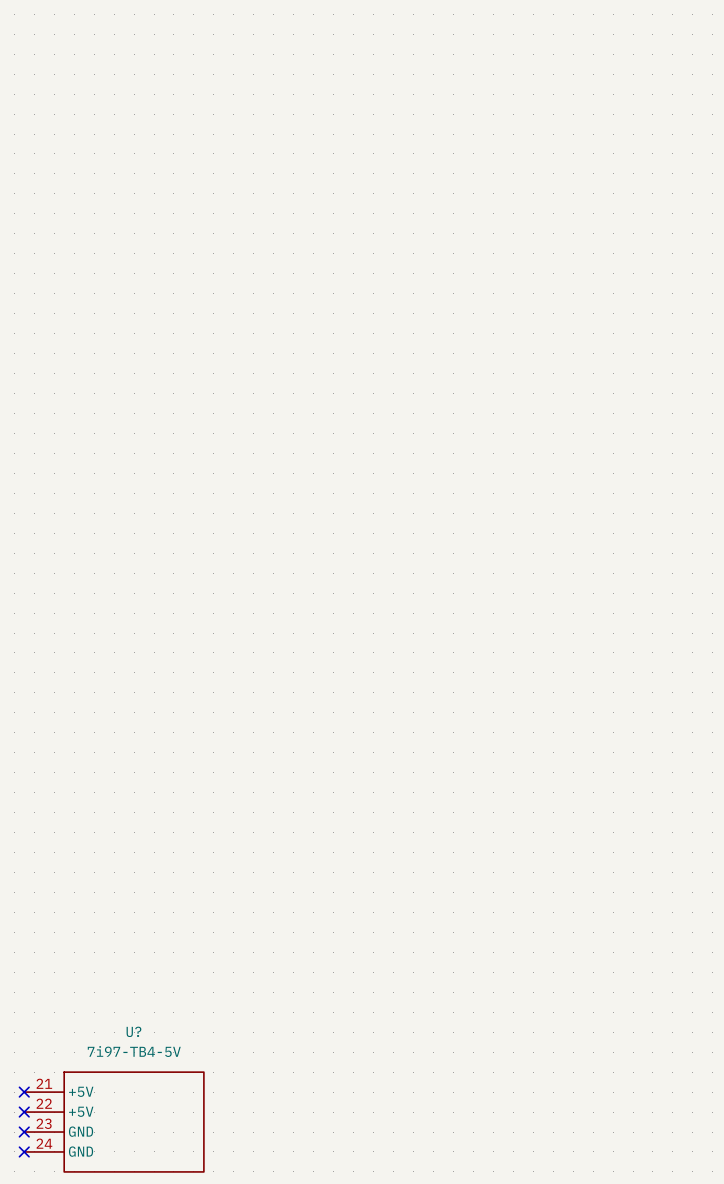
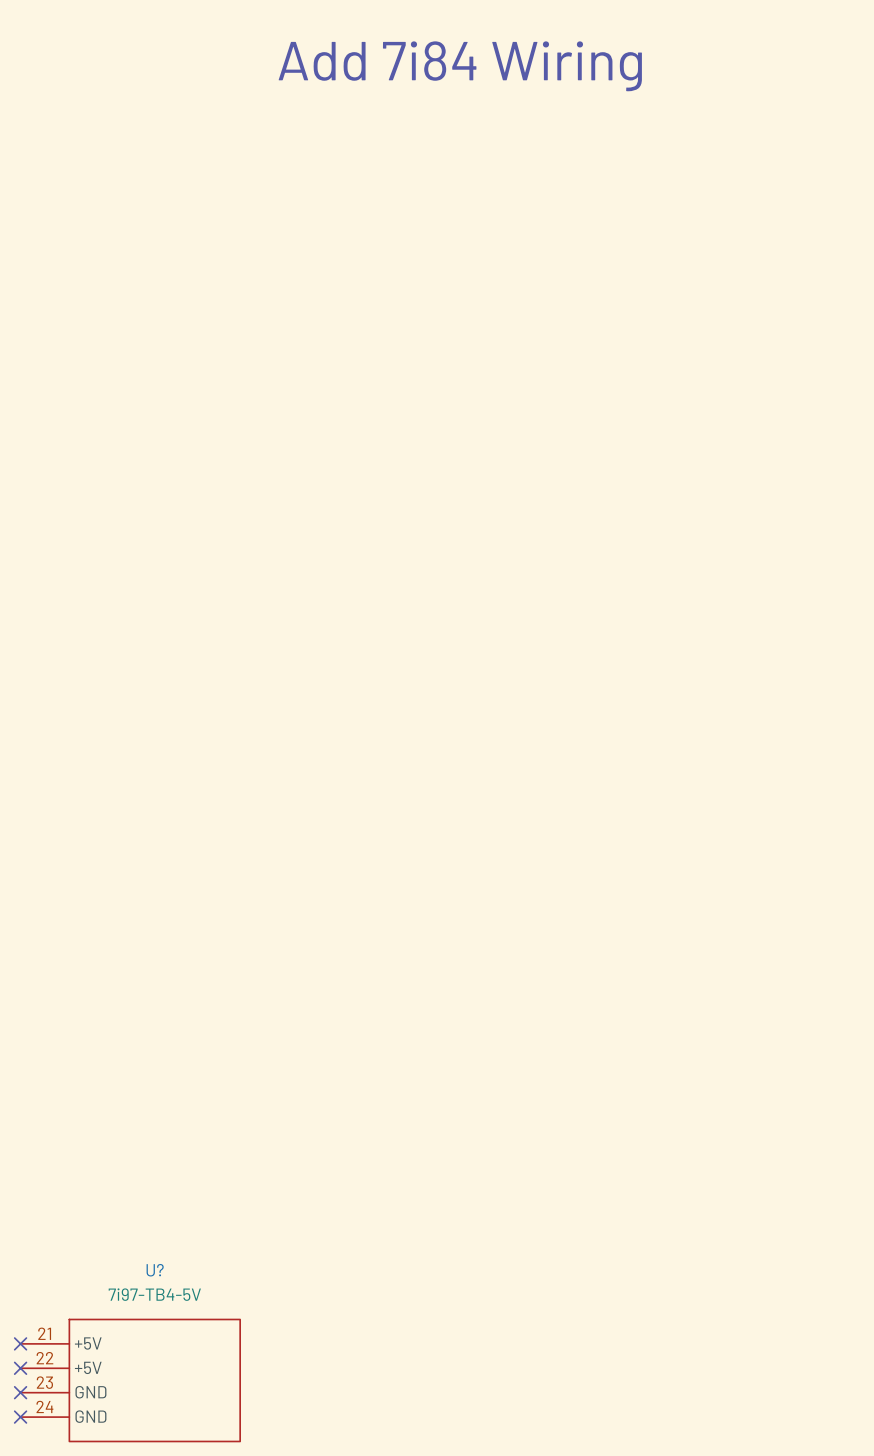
text: none -> Add 7i84 Wiring (460, 66)

